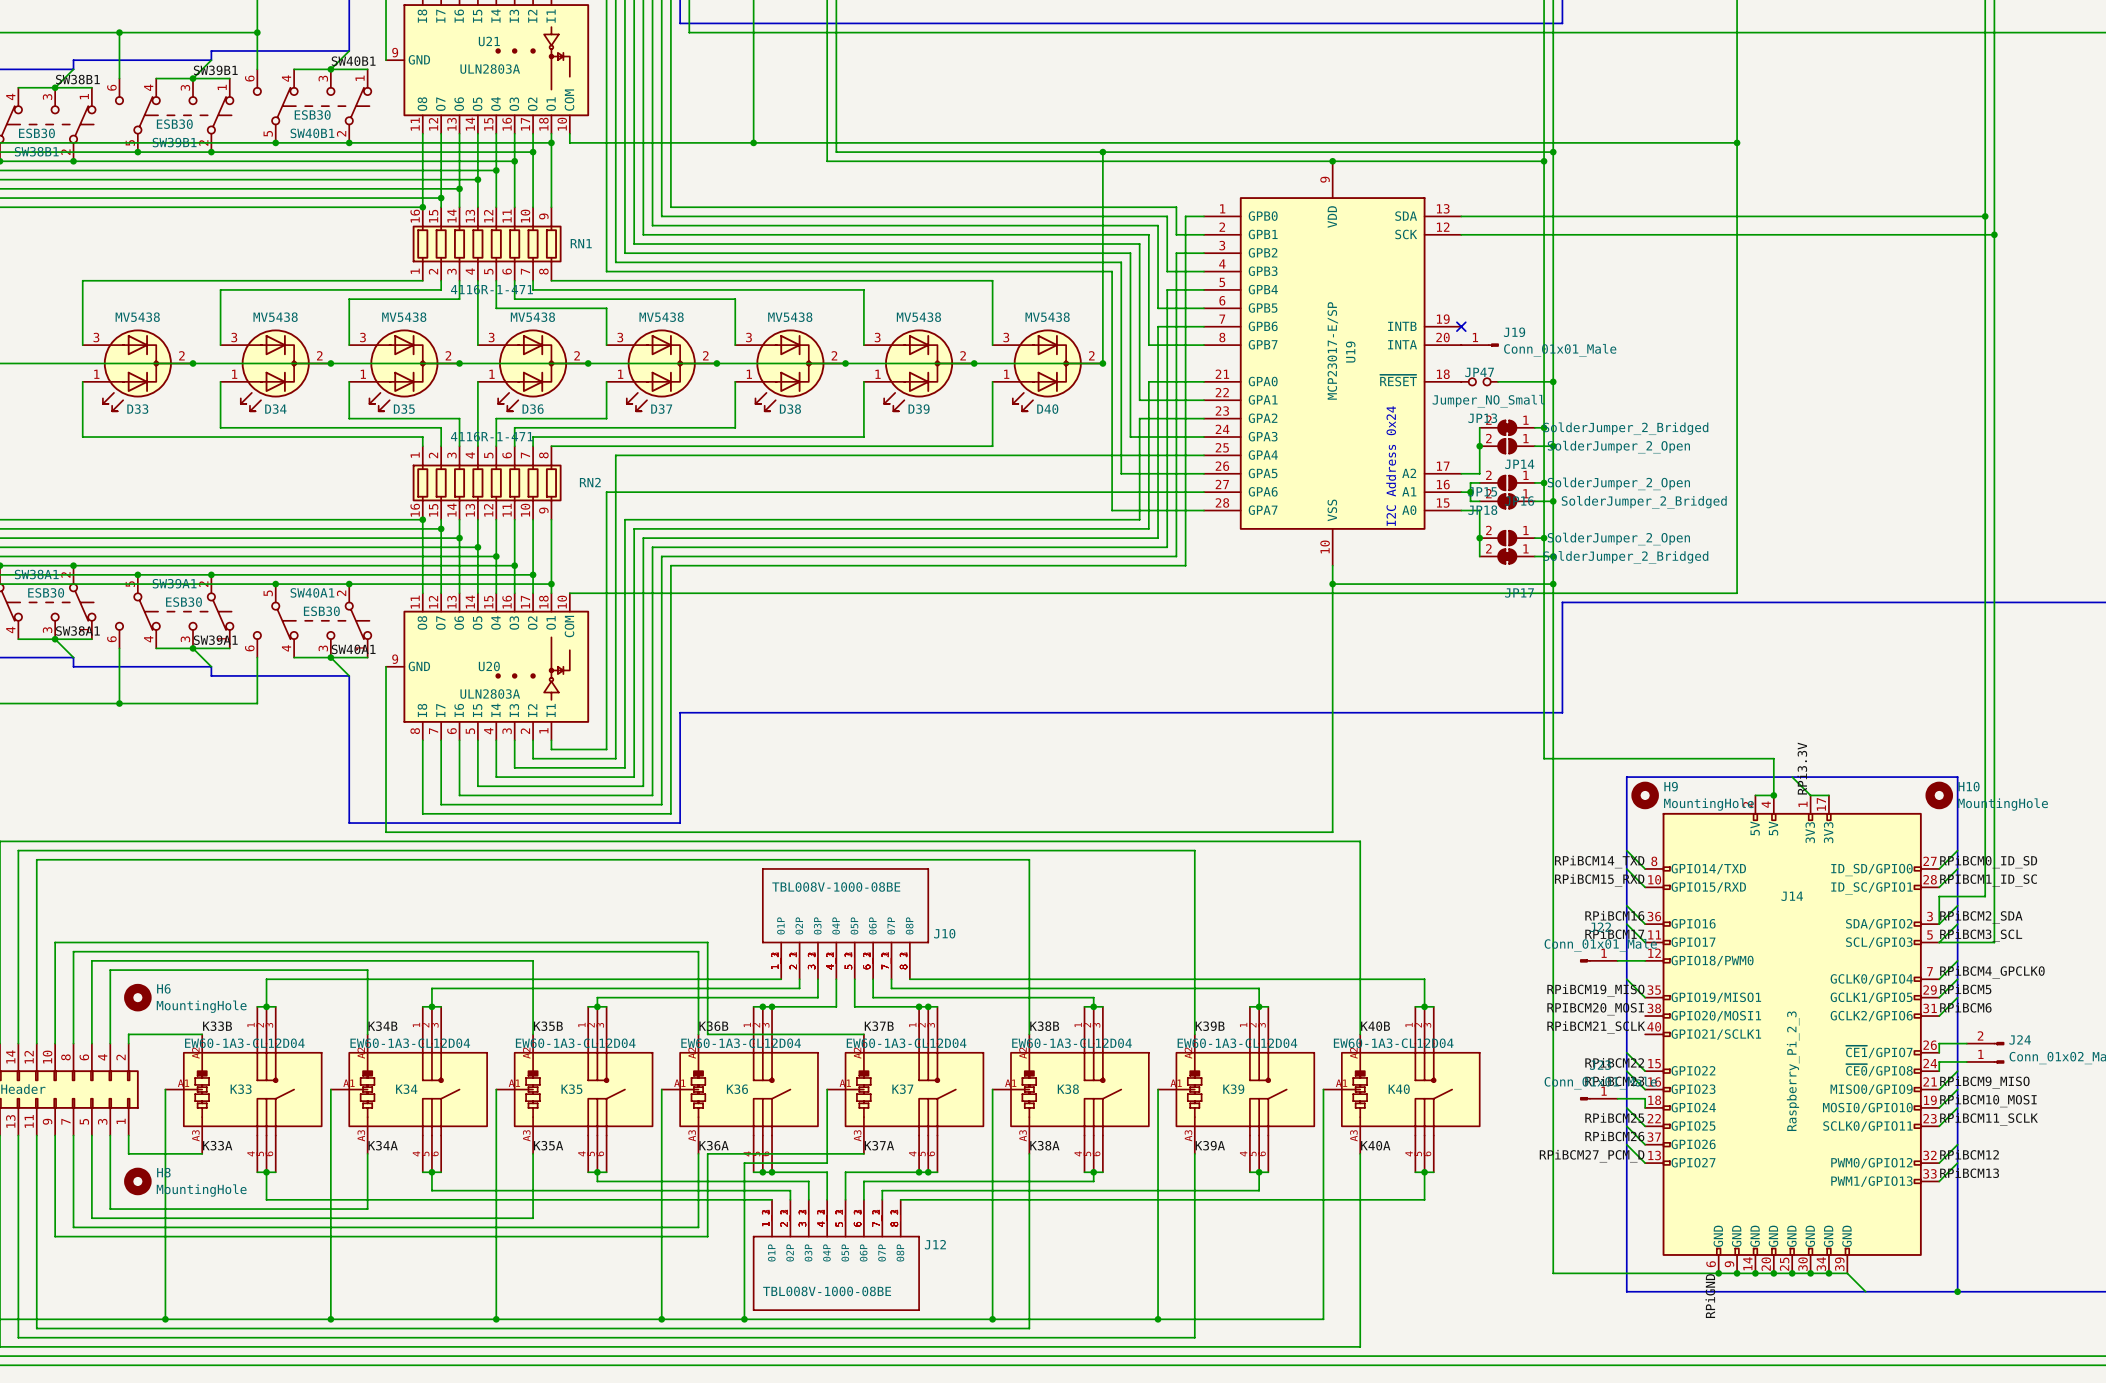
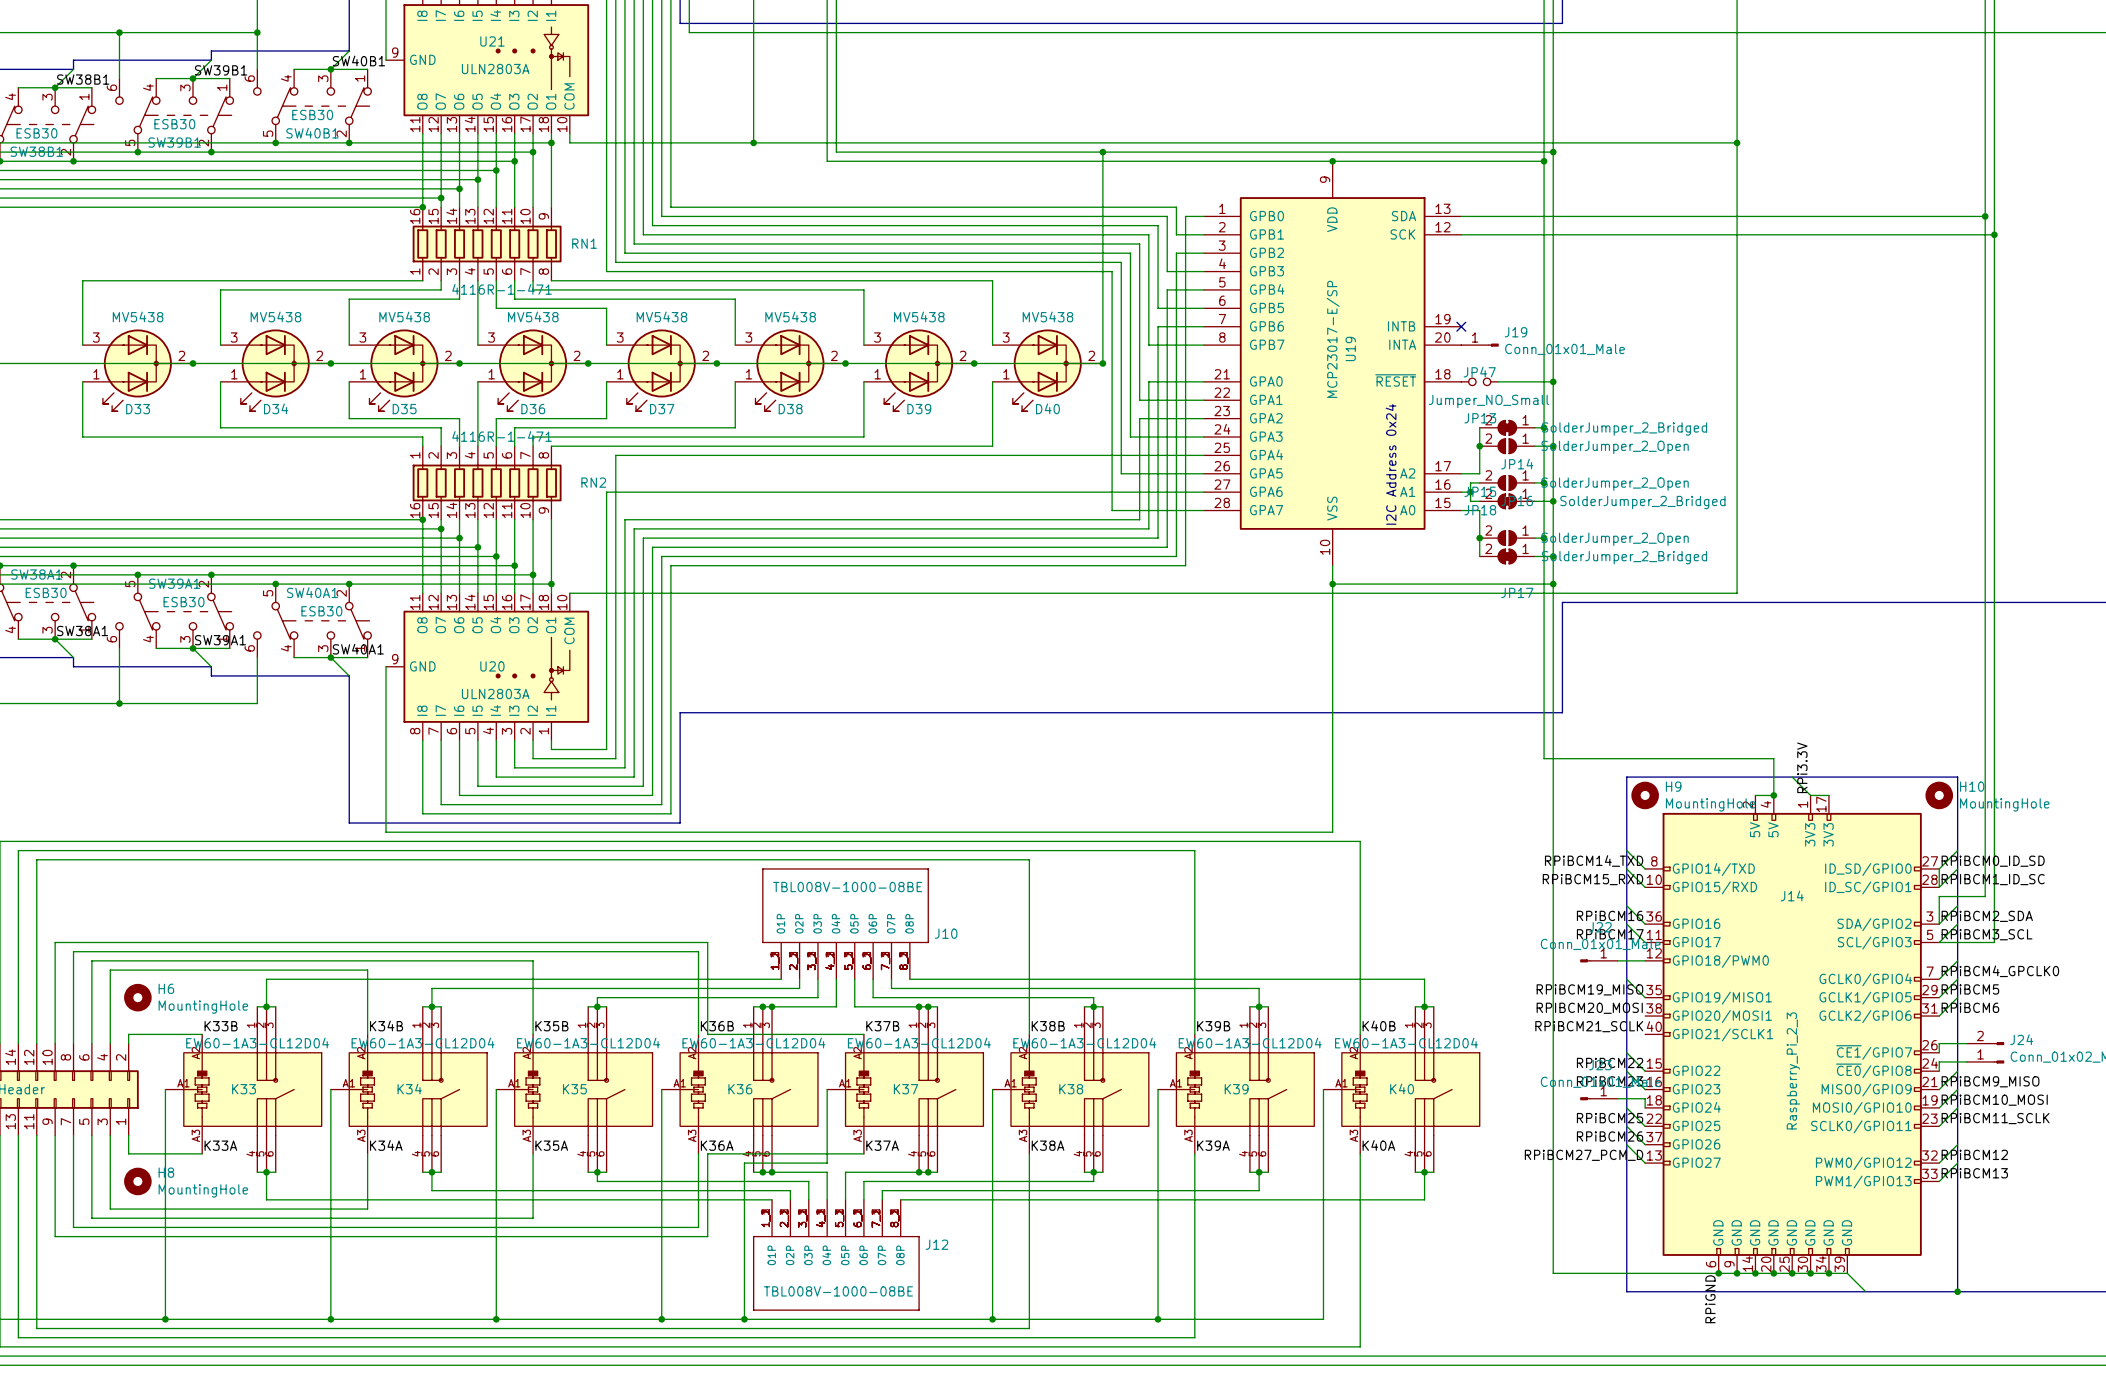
wire: none -> (1939, 868) (1939, 887)

